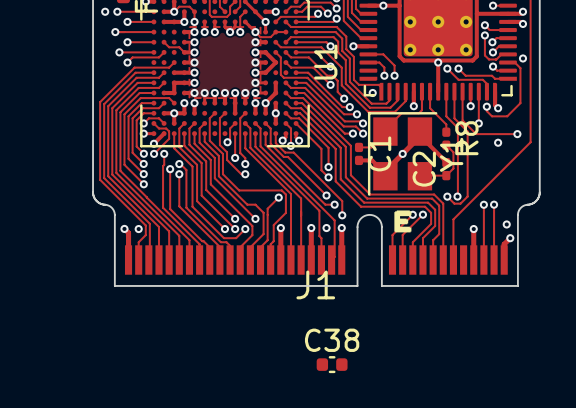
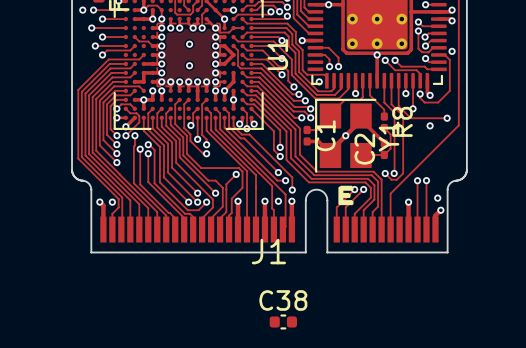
via: none -> (189, 44)
via: none -> (189, 65)

